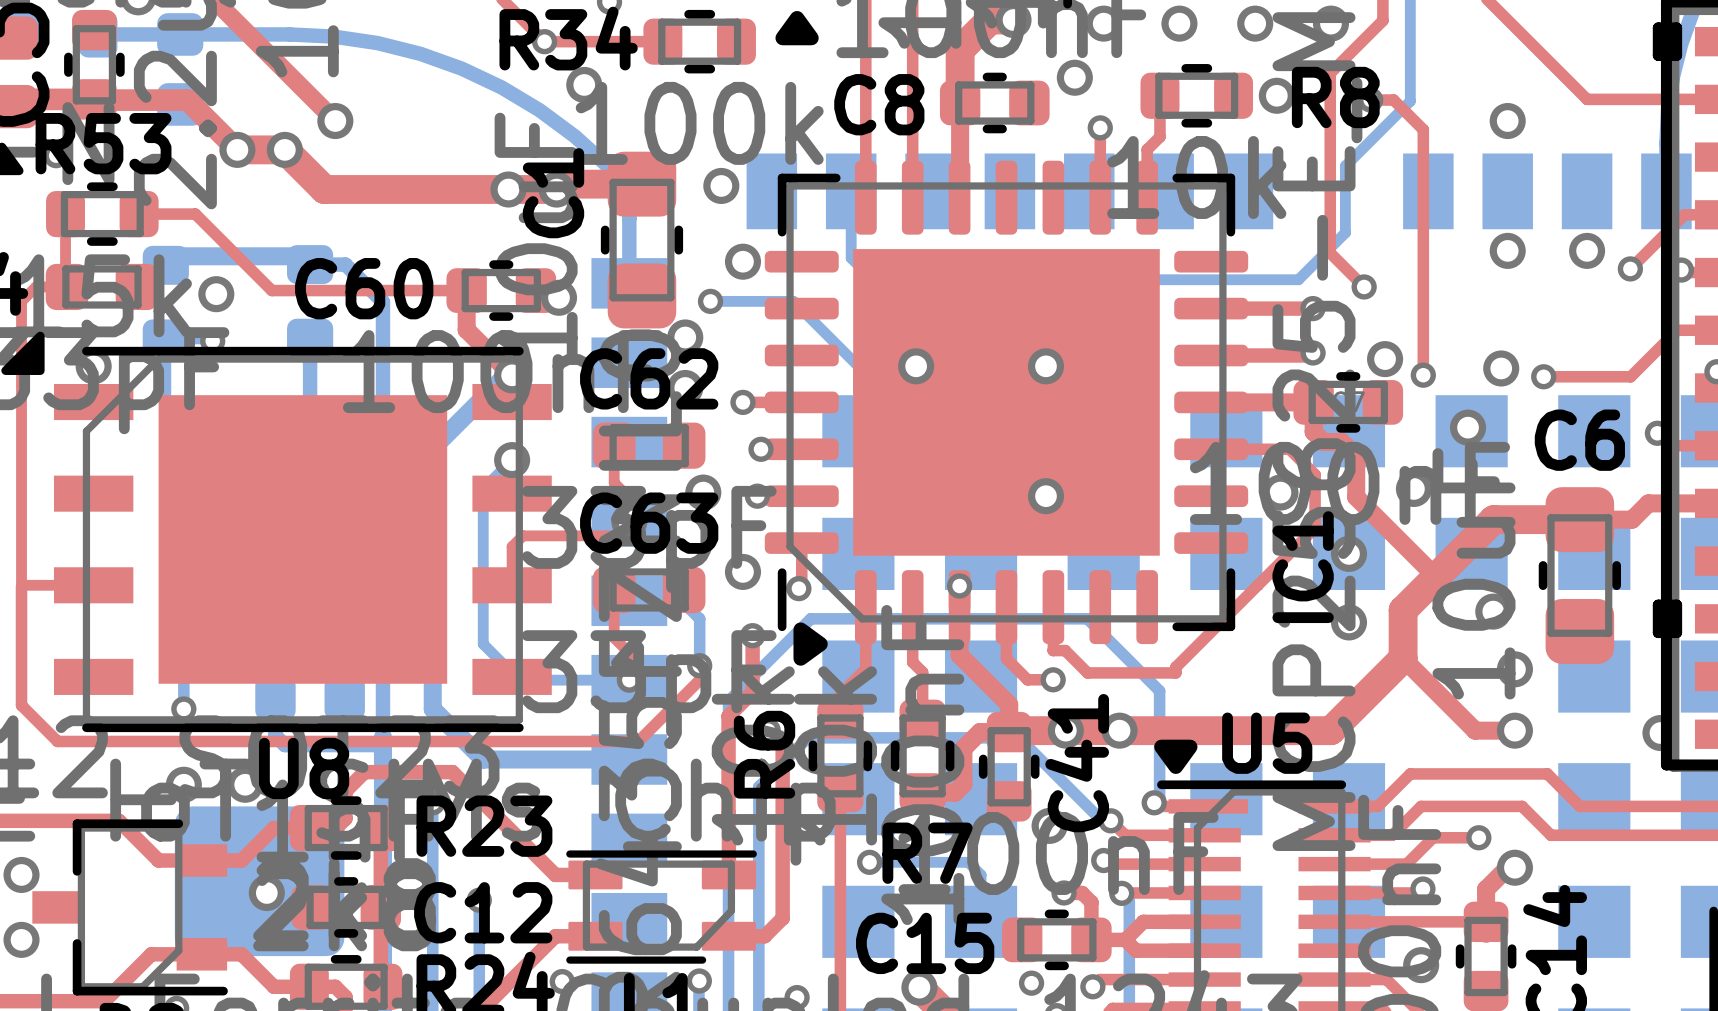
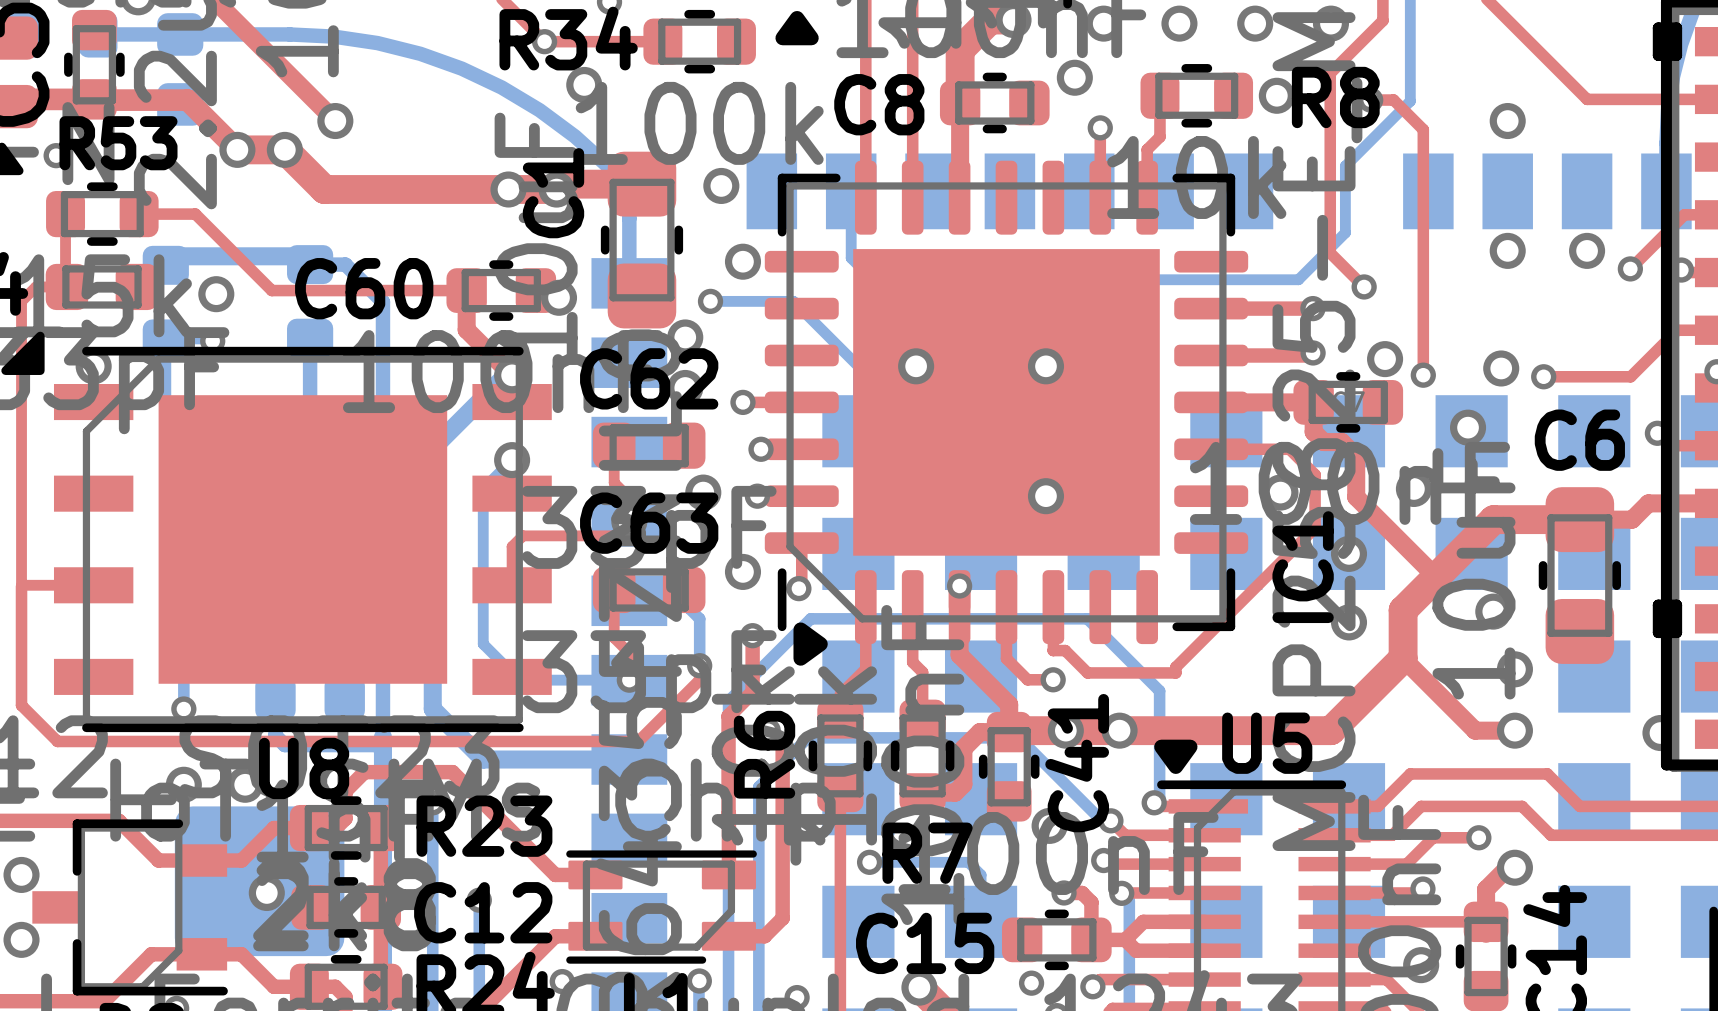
R53 name position: R53 (103, 143) -> R53 (118, 143)

